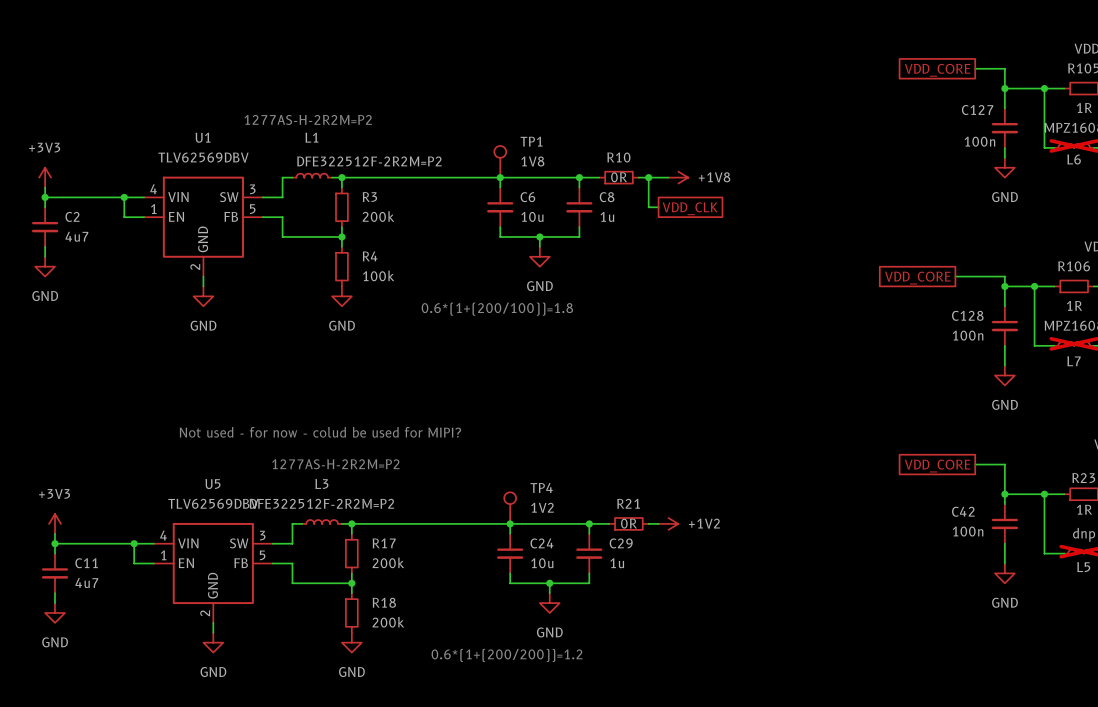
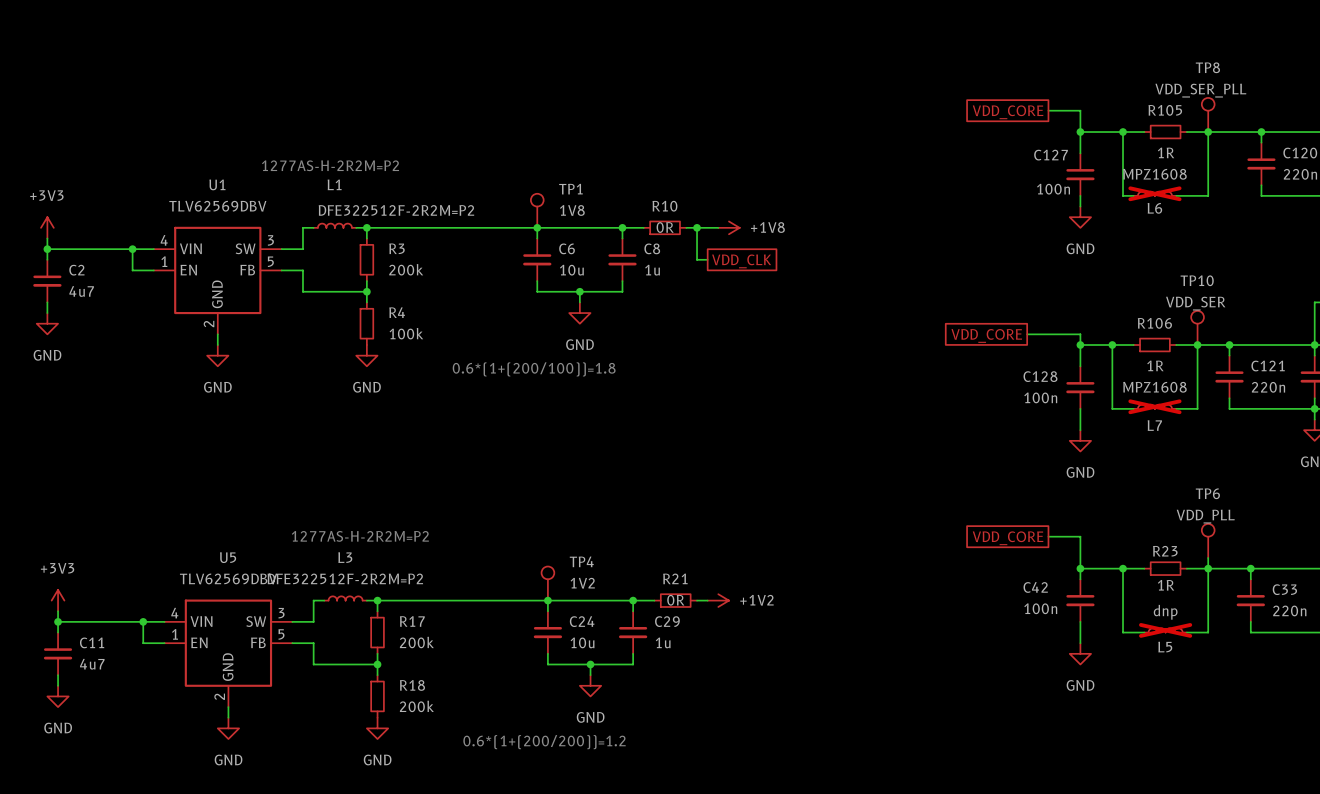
text: Not used - for now - colud be used for MIPI? (320, 432) -> none

